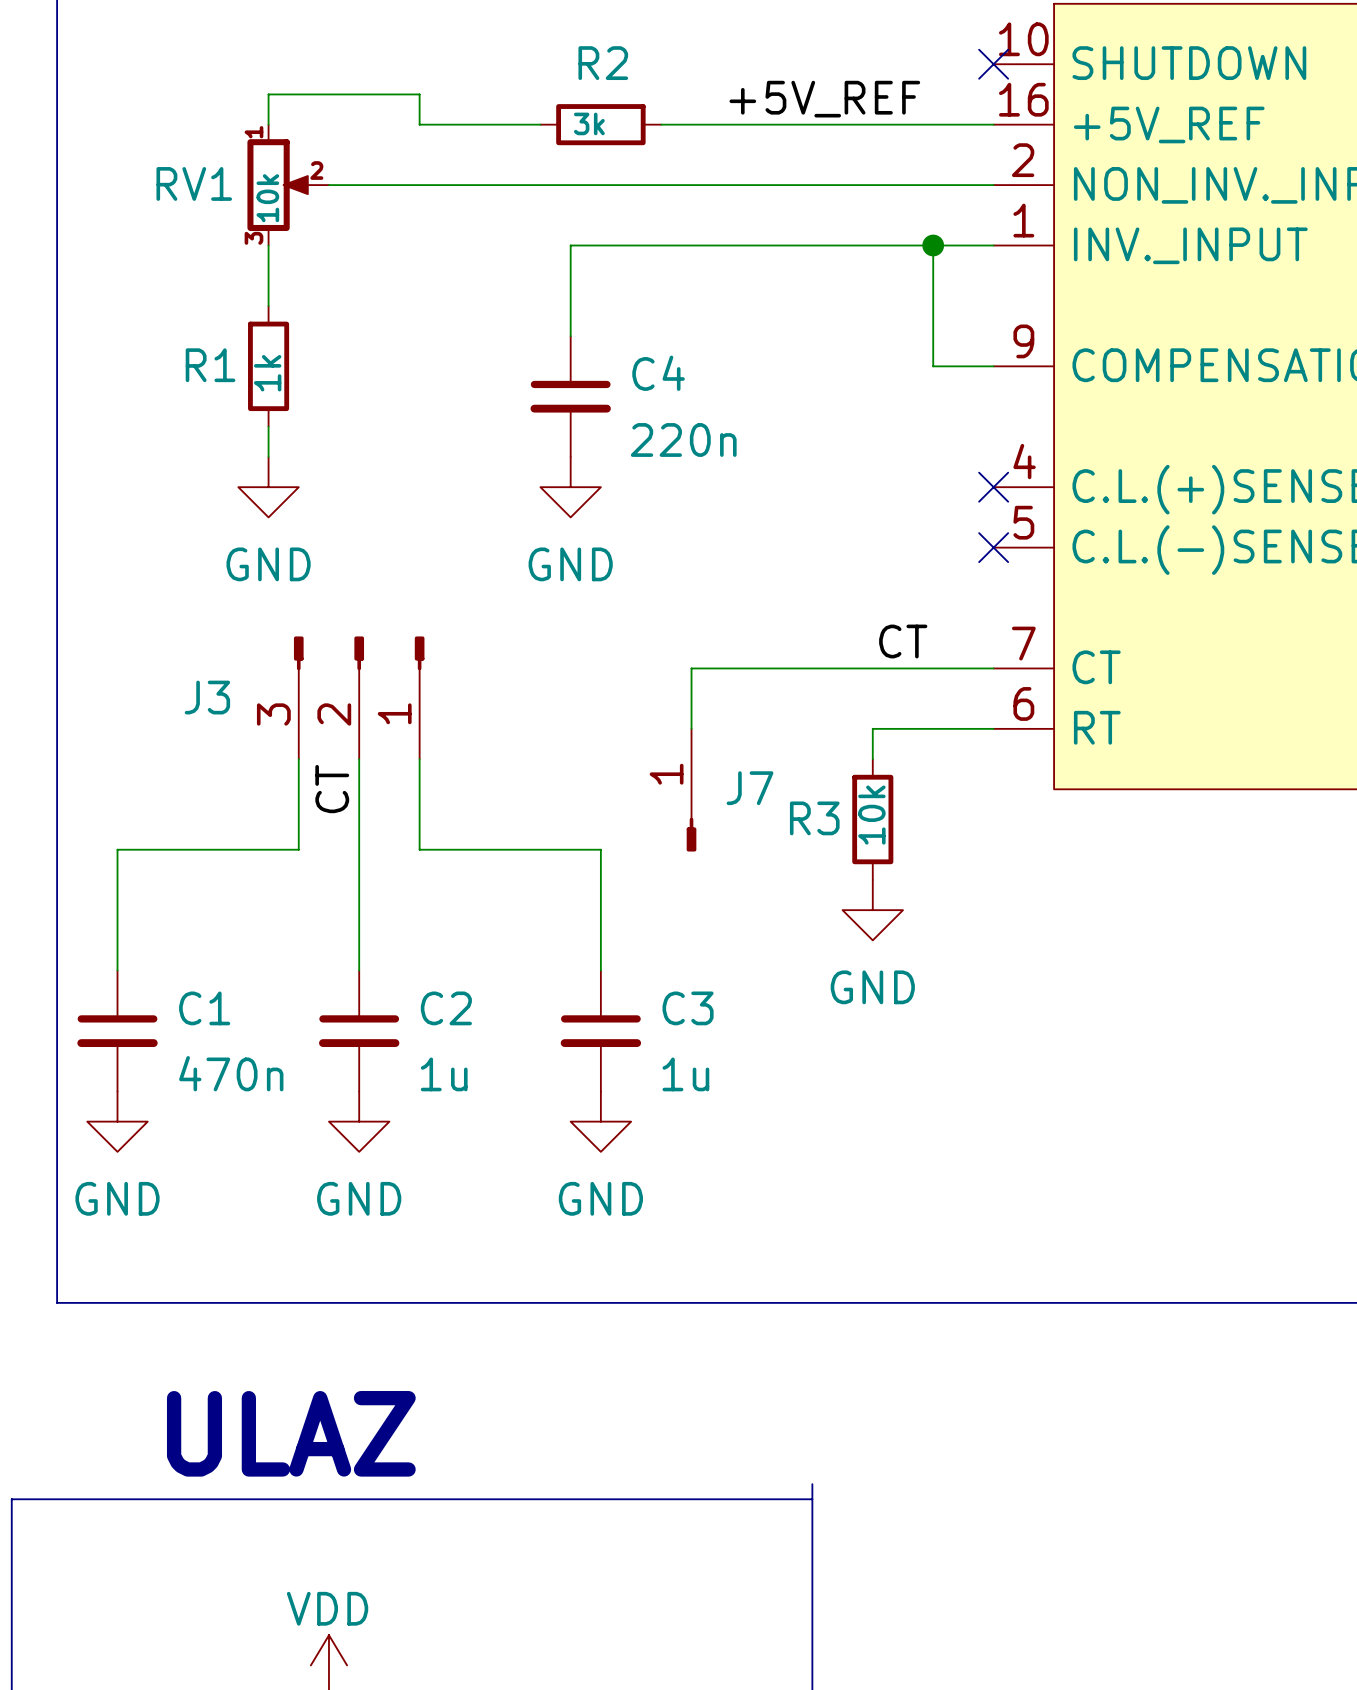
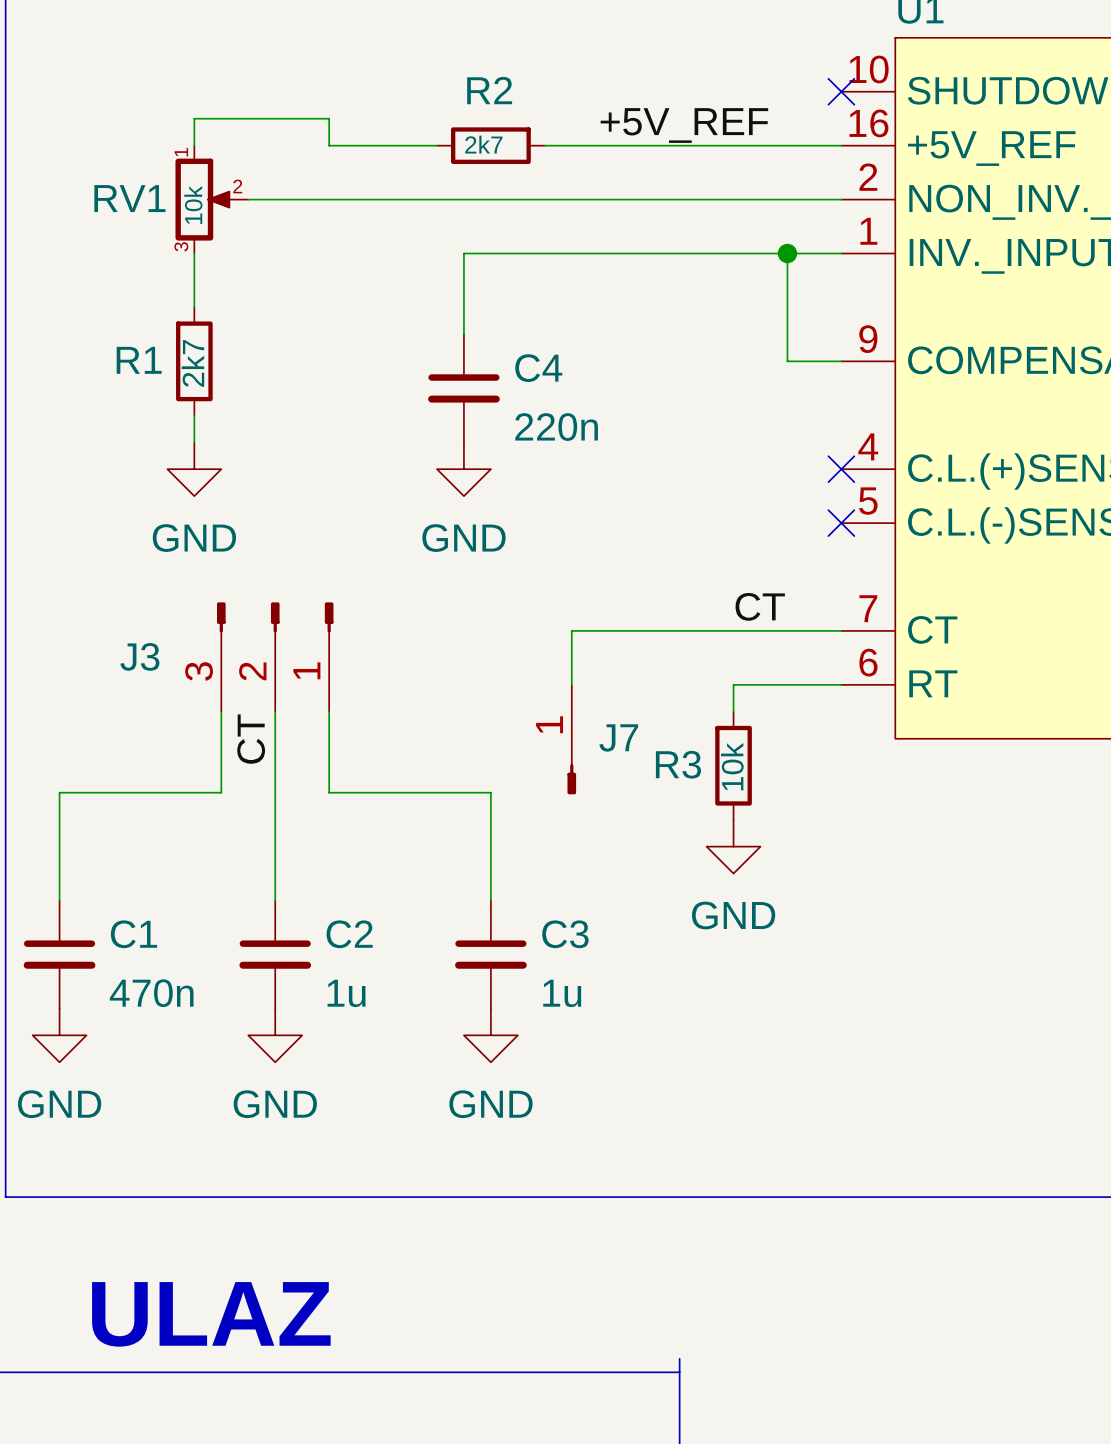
R2 value: 3k (589, 123) -> 2k7 (483, 144)
R1 value: 1k (267, 373) -> 2k7 (193, 363)

